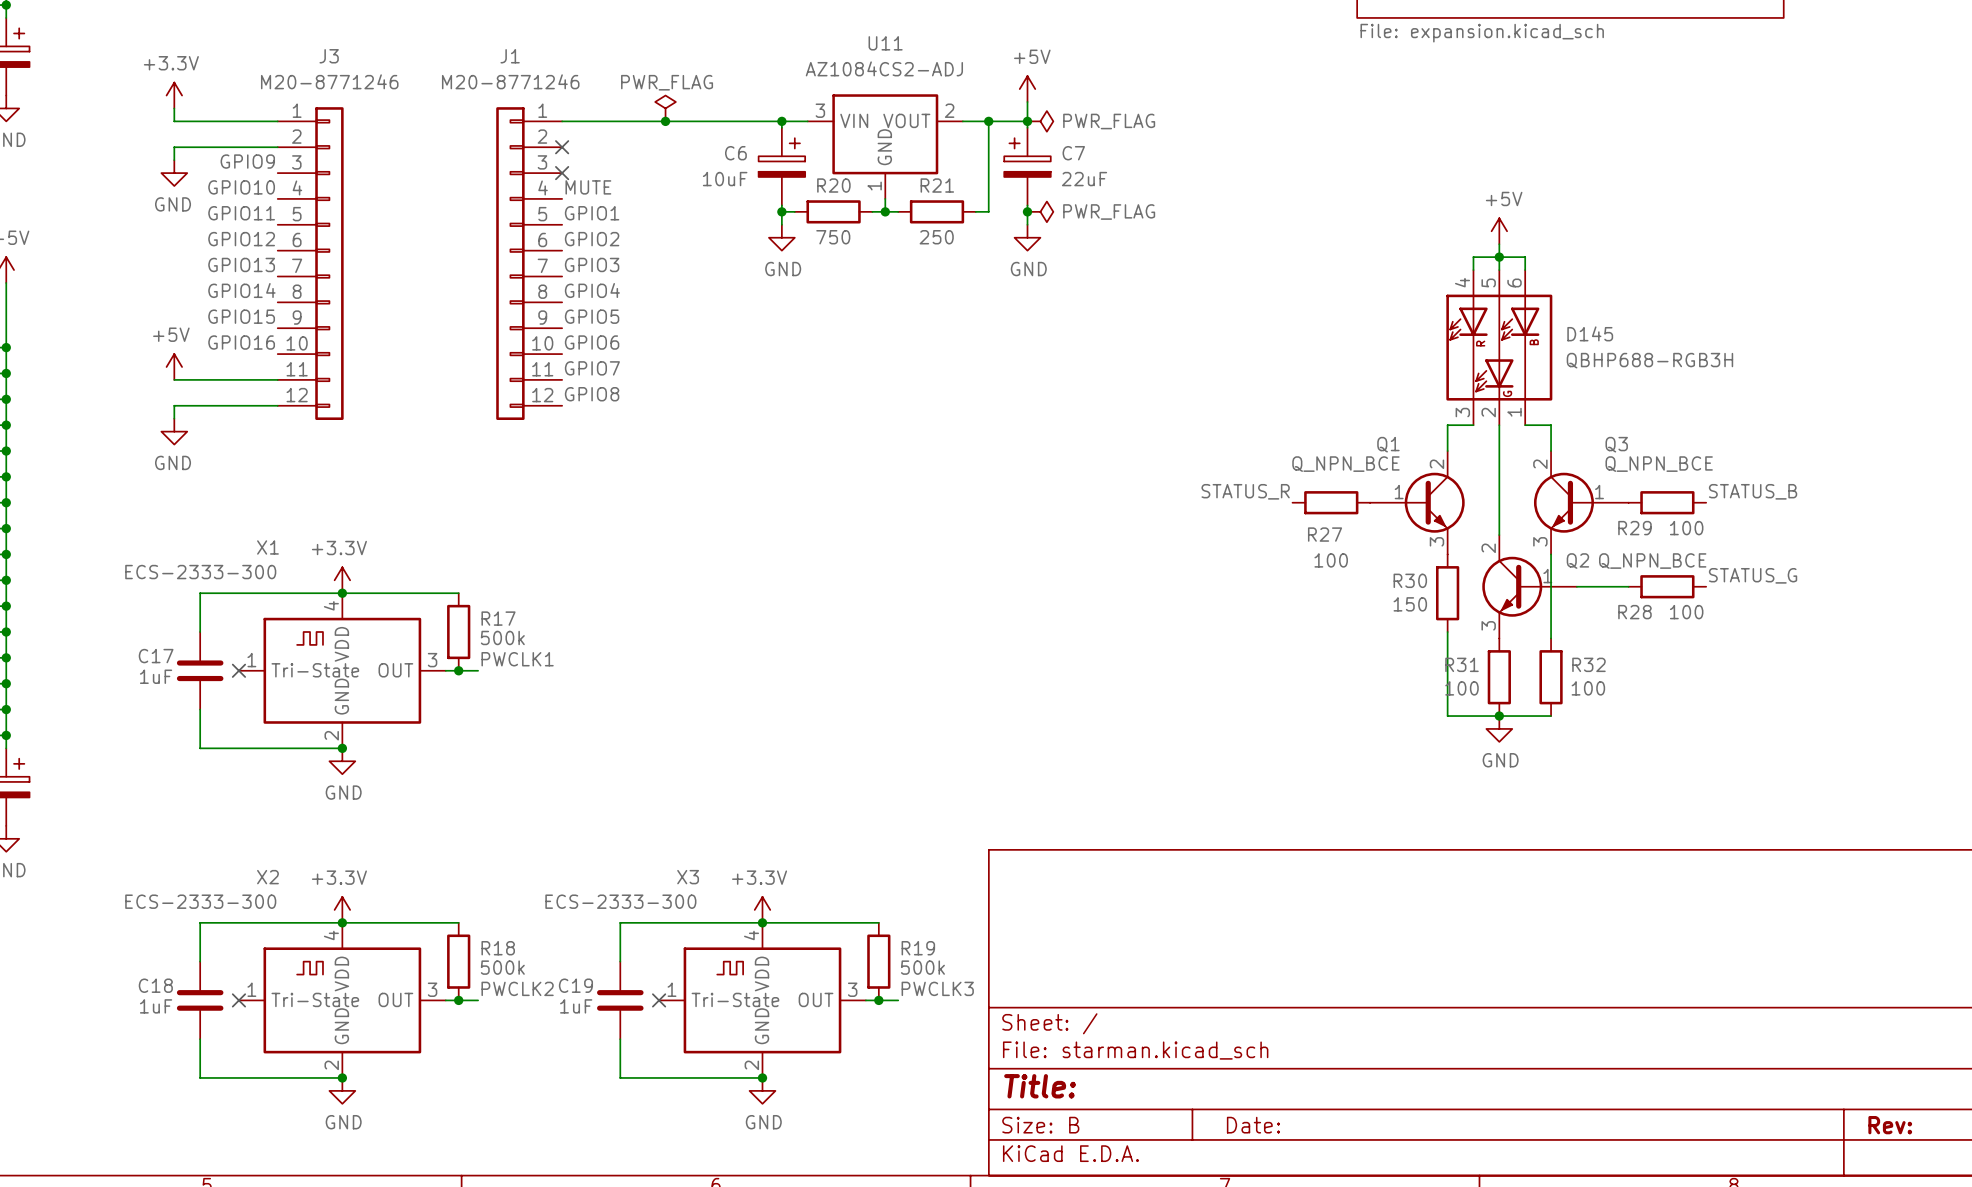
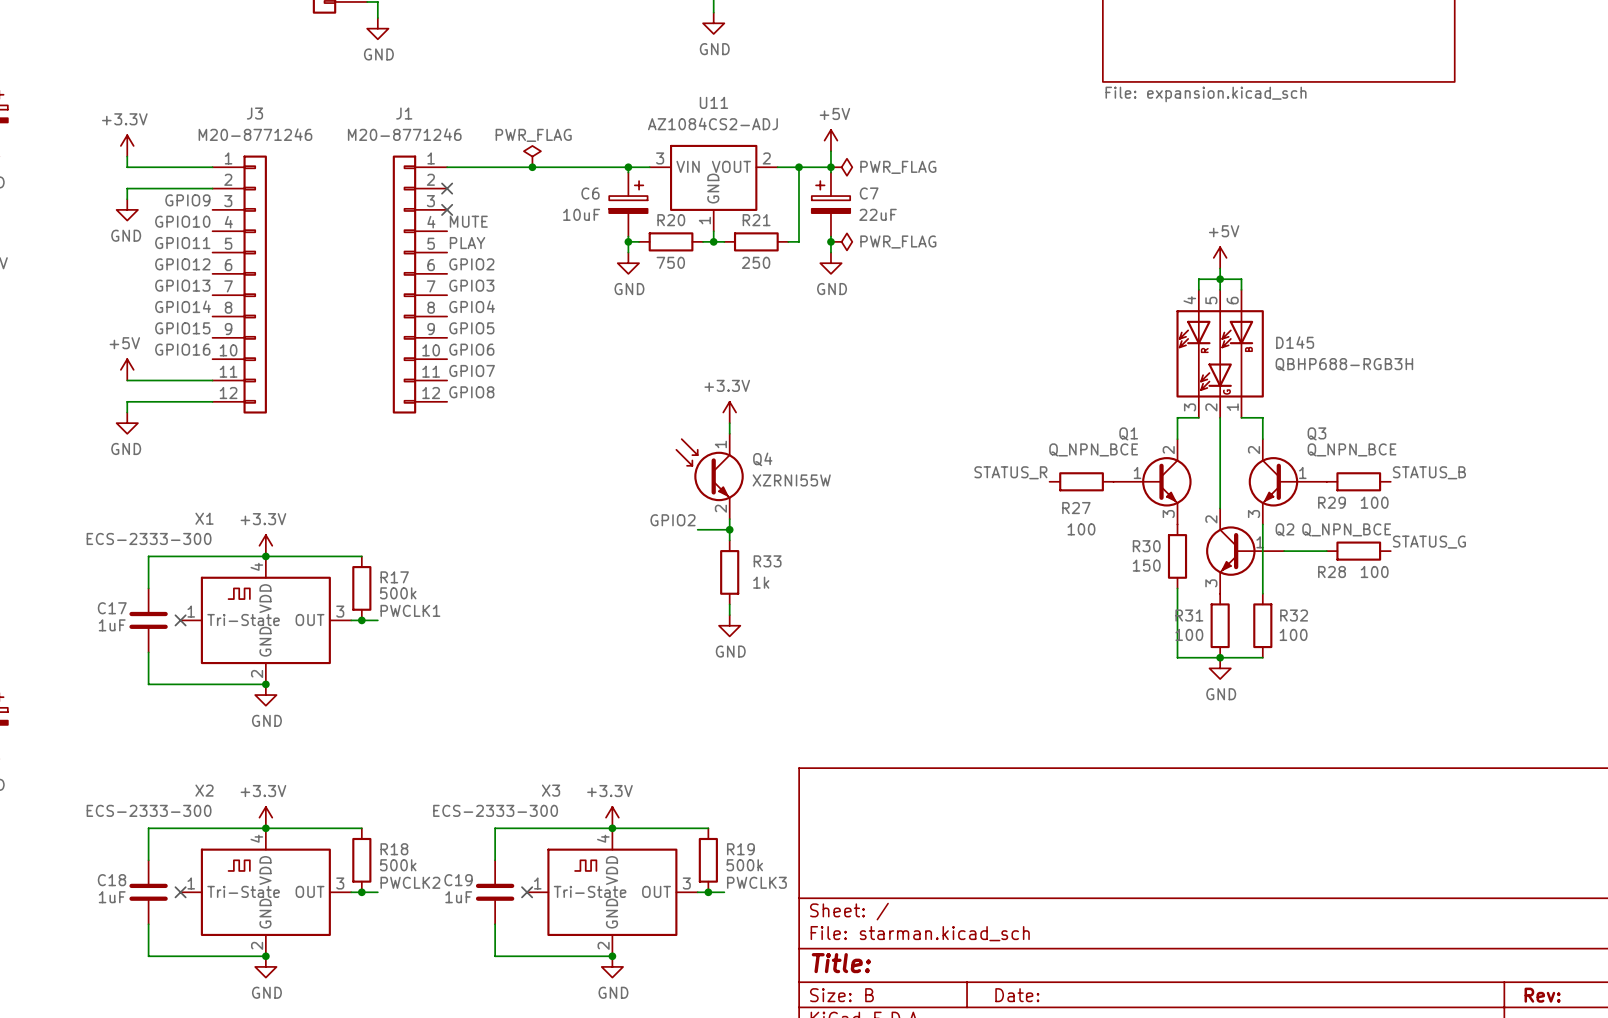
label: GPIO1 (592, 213) -> PLAY (467, 243)
power symbol: none -> +3.3V (729, 412)
wire: none -> (729, 423) (729, 433)
Q4: none -> XZRNI55W (710, 476)
wire: none -> (729, 519) (729, 540)
label: none -> GPIO2 (672, 520)
wire: none -> (697, 529) (729, 529)
junction: none -> (729, 529)
R33: none -> 1k (729, 572)
wire: none -> (729, 604) (729, 615)
power symbol: none -> GND (729, 625)

